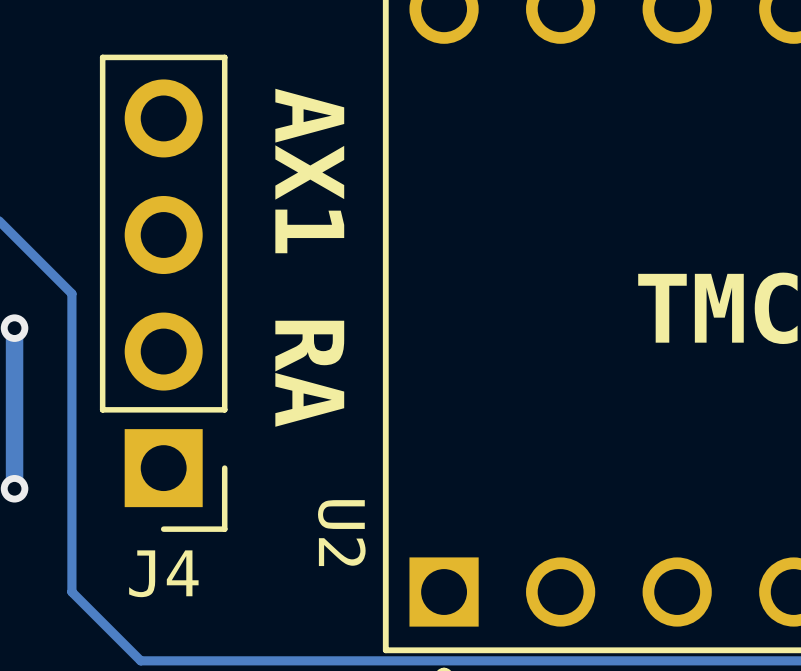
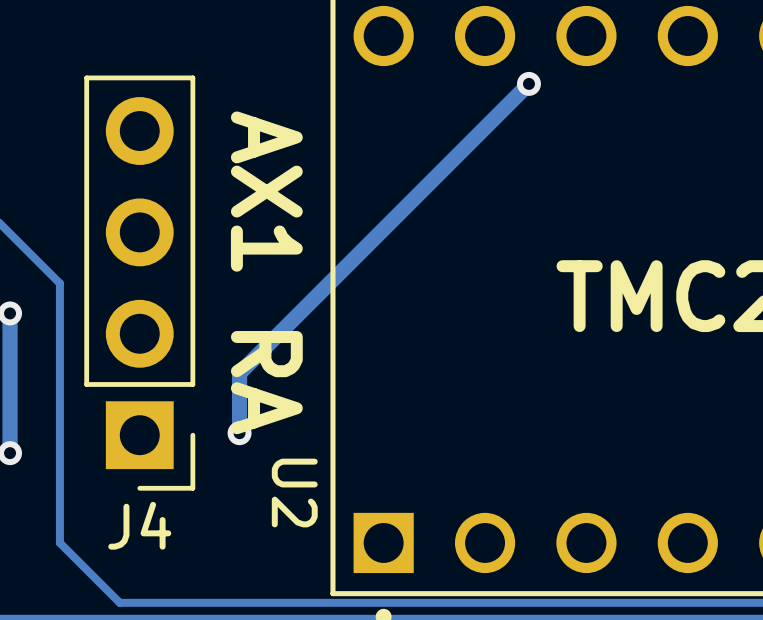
track: none -> (528, 83) (239, 373) (239, 433)
via: none -> (528, 83)
via: none -> (239, 433)

